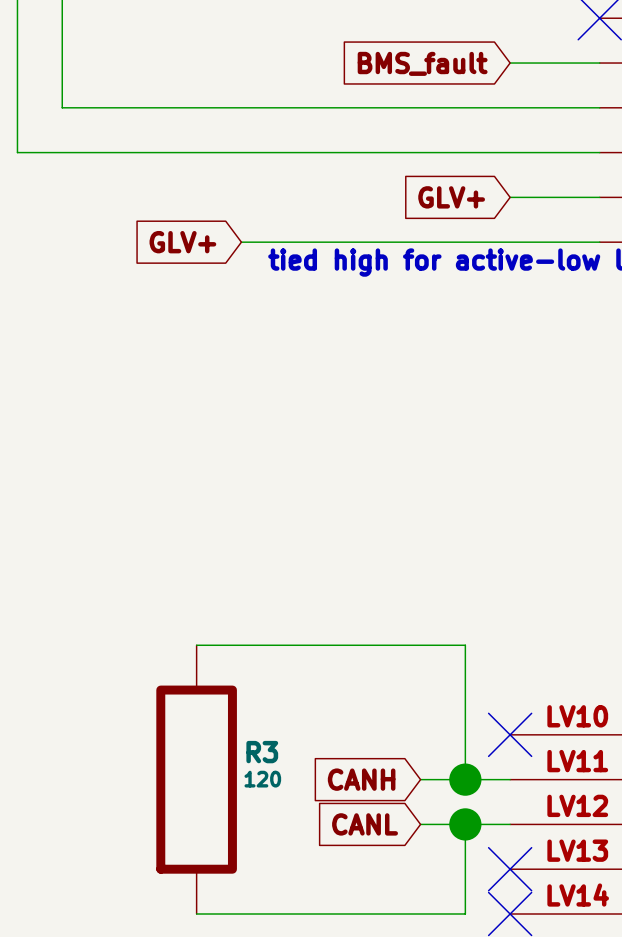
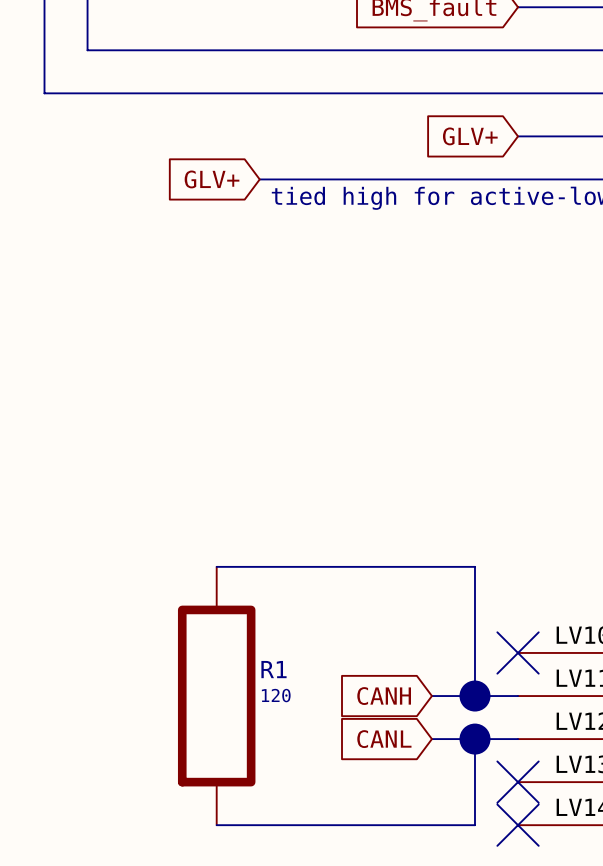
R3 name: R3 (262, 752) -> R1 (273, 669)

